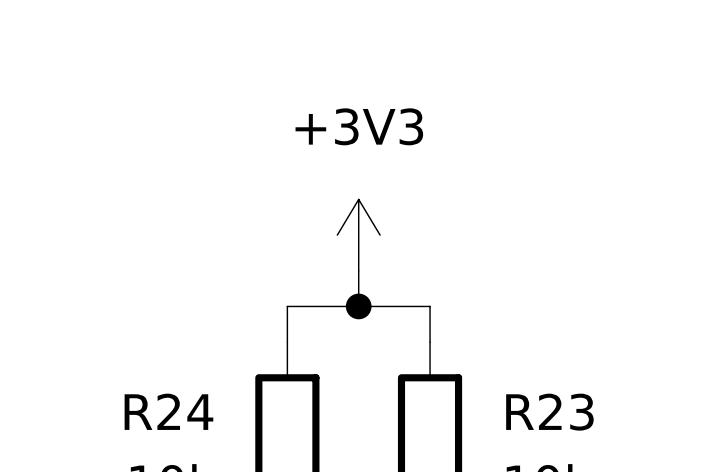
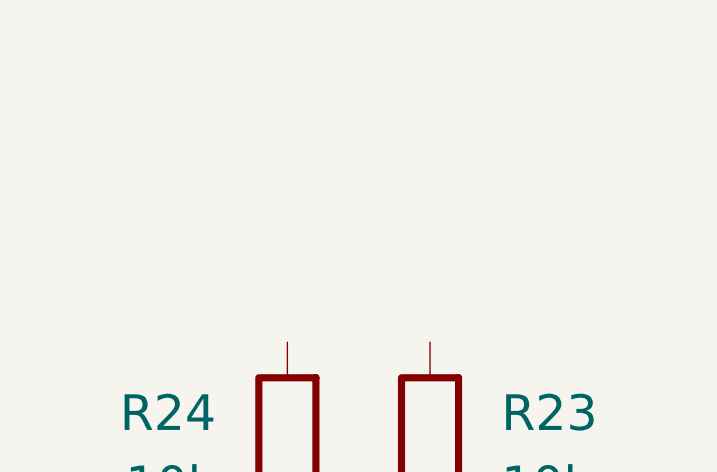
power symbol: +3V3 (358, 235) -> none
wire: (358, 270) (358, 306) -> none
junction: (358, 306) -> none
wire: (287, 342) (287, 306) (430, 306) (430, 342) -> none

